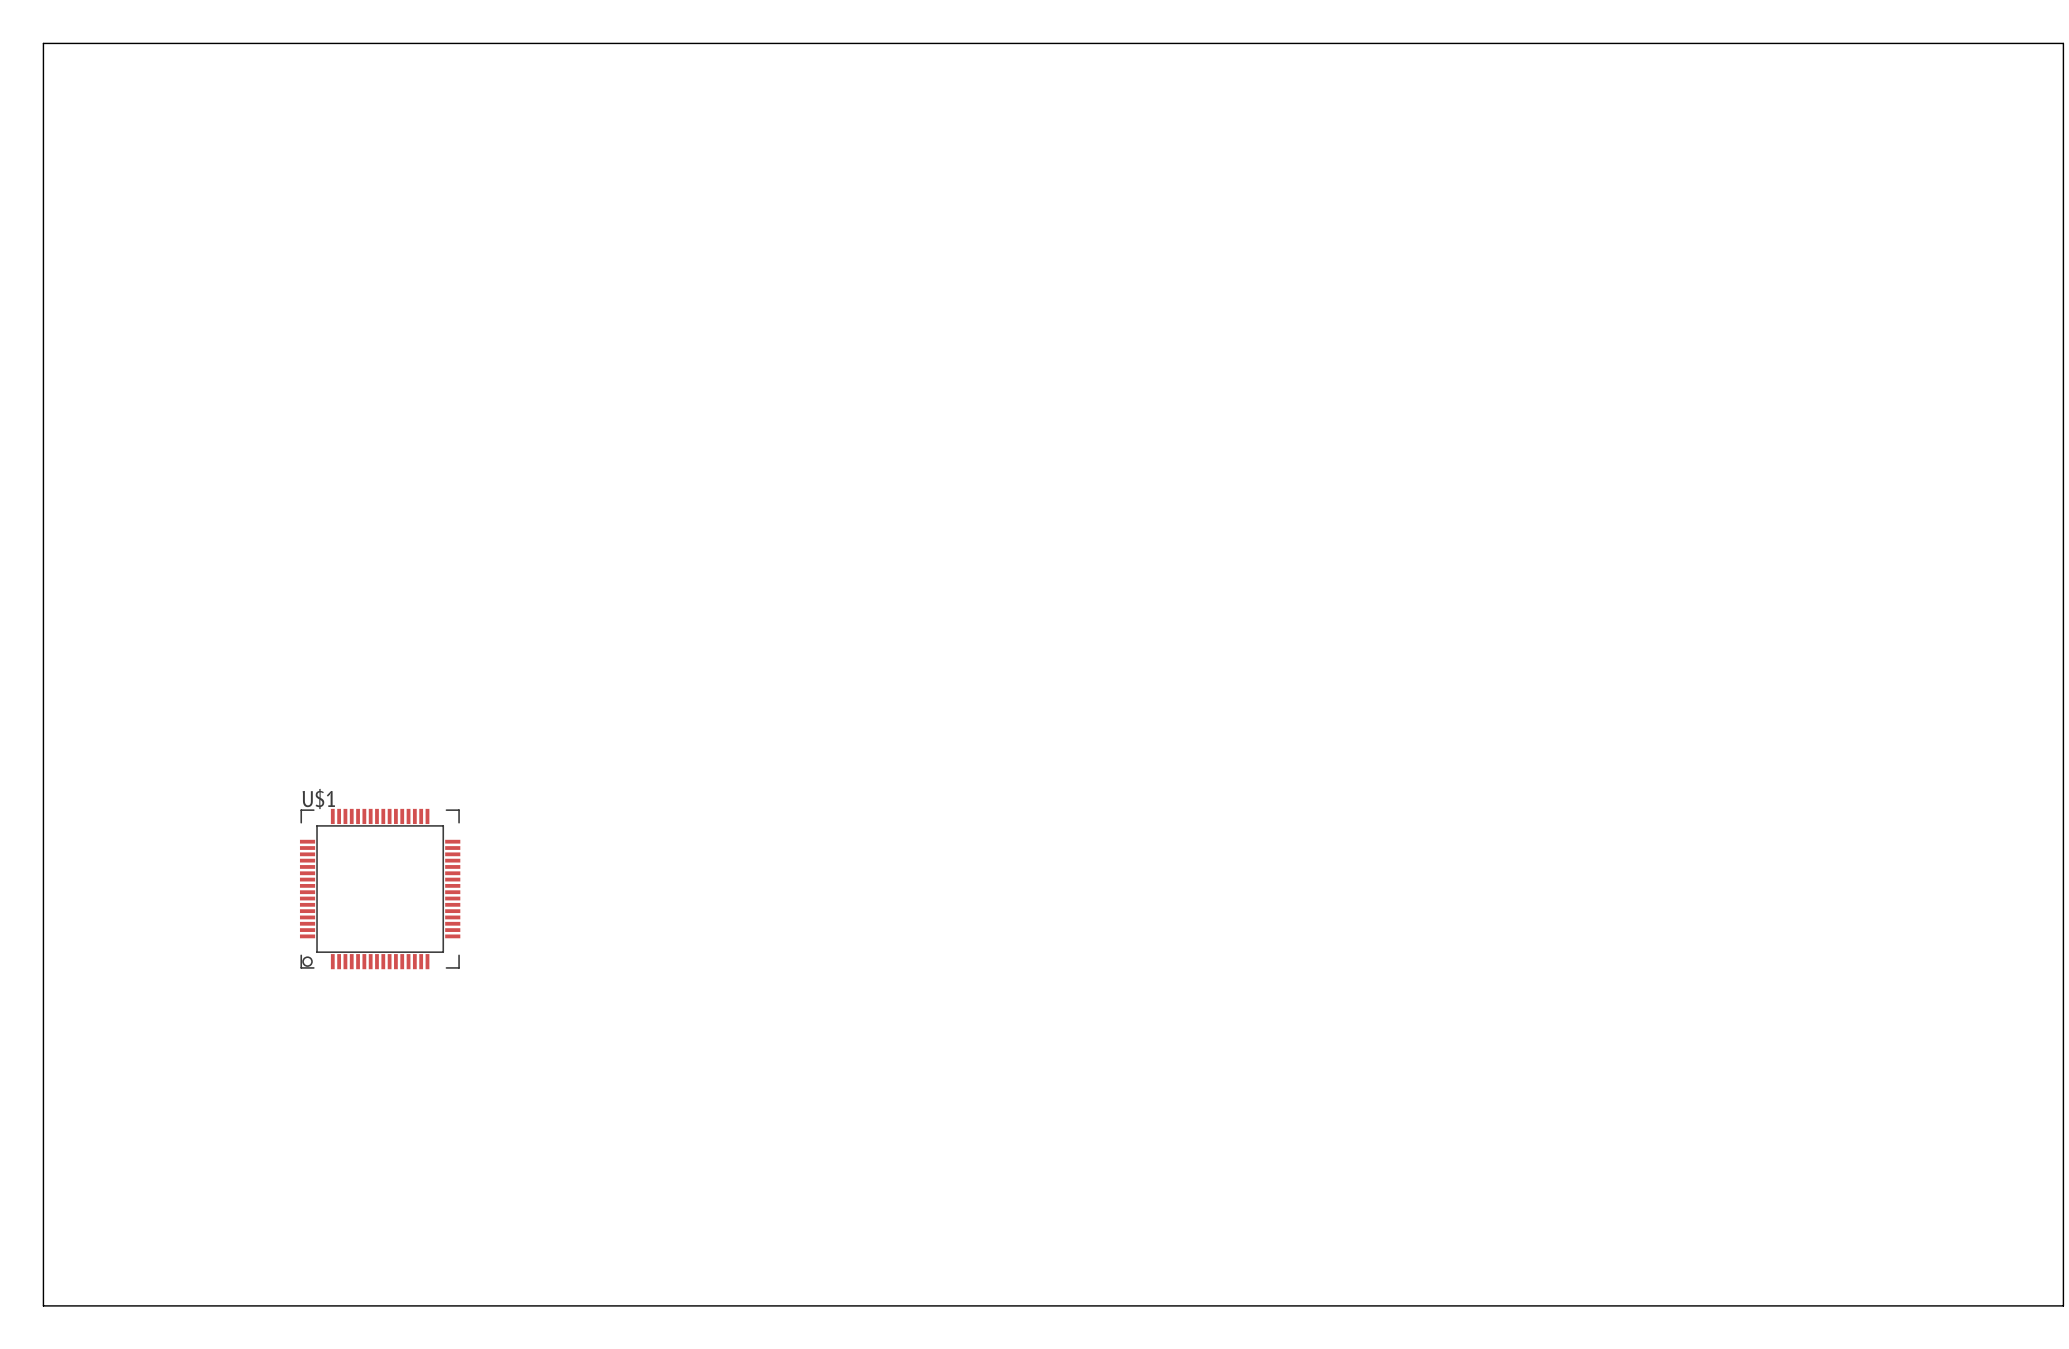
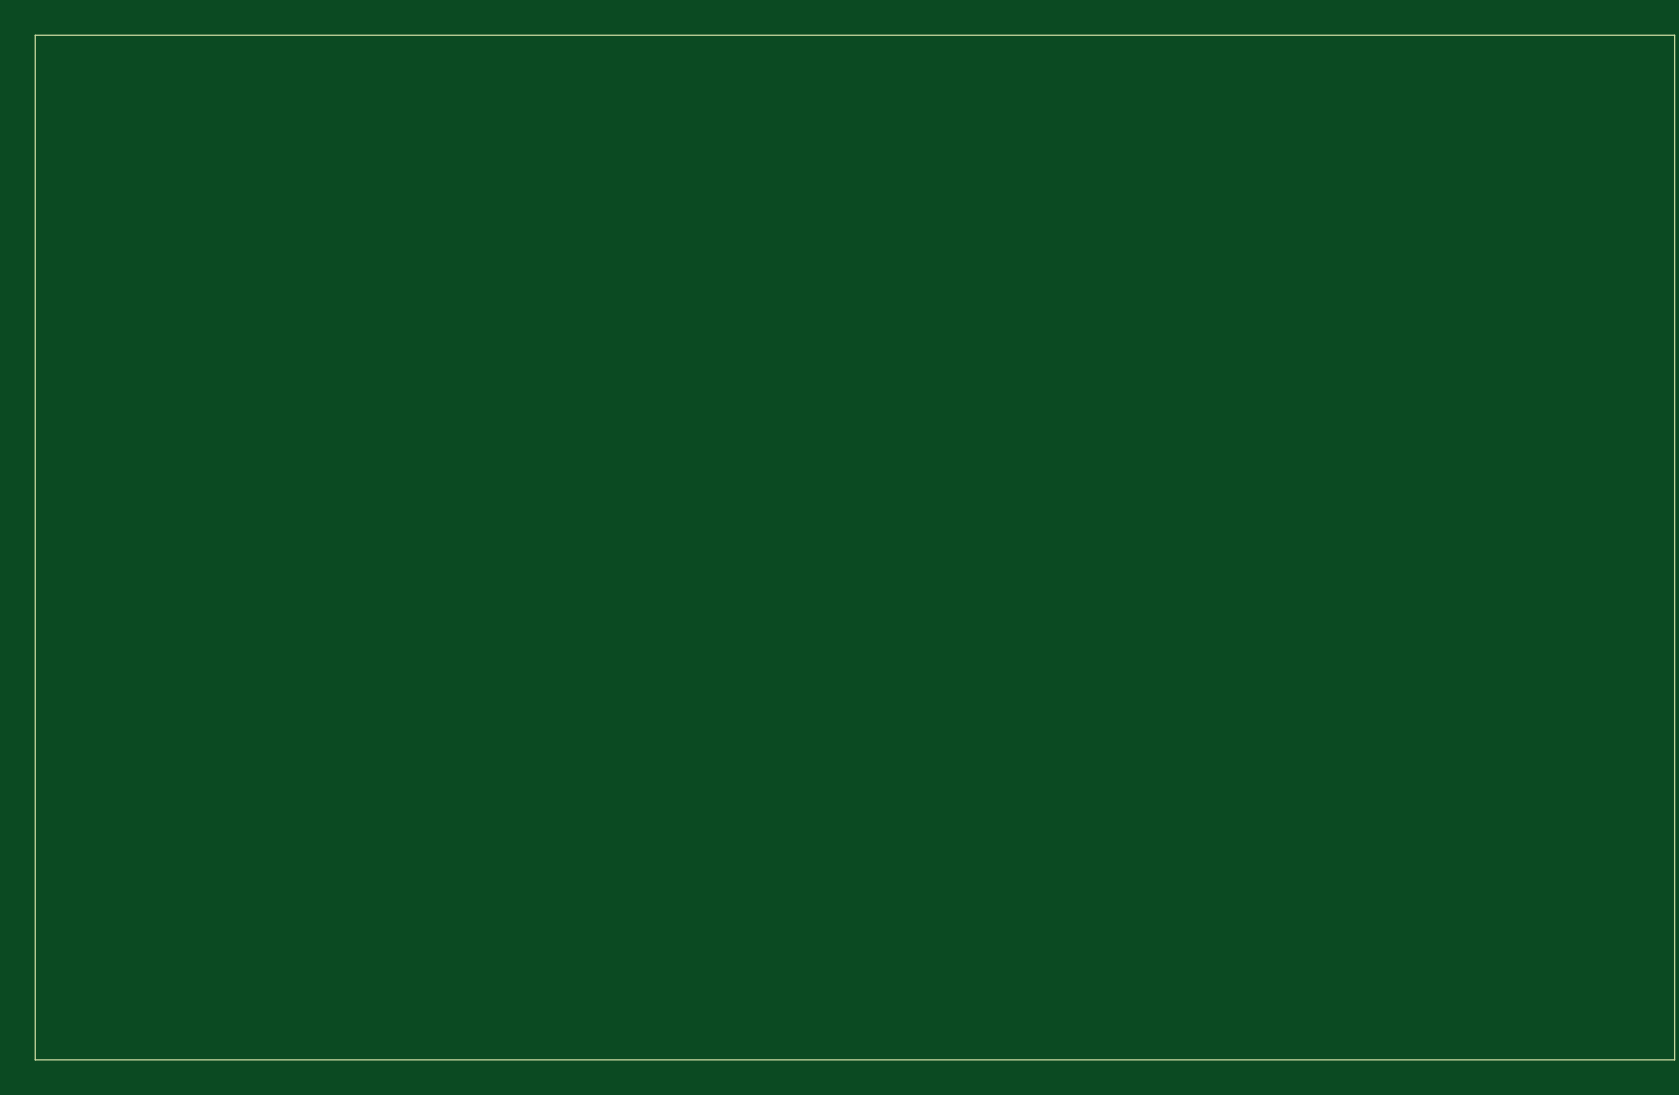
U$1: (380, 889) -> none

